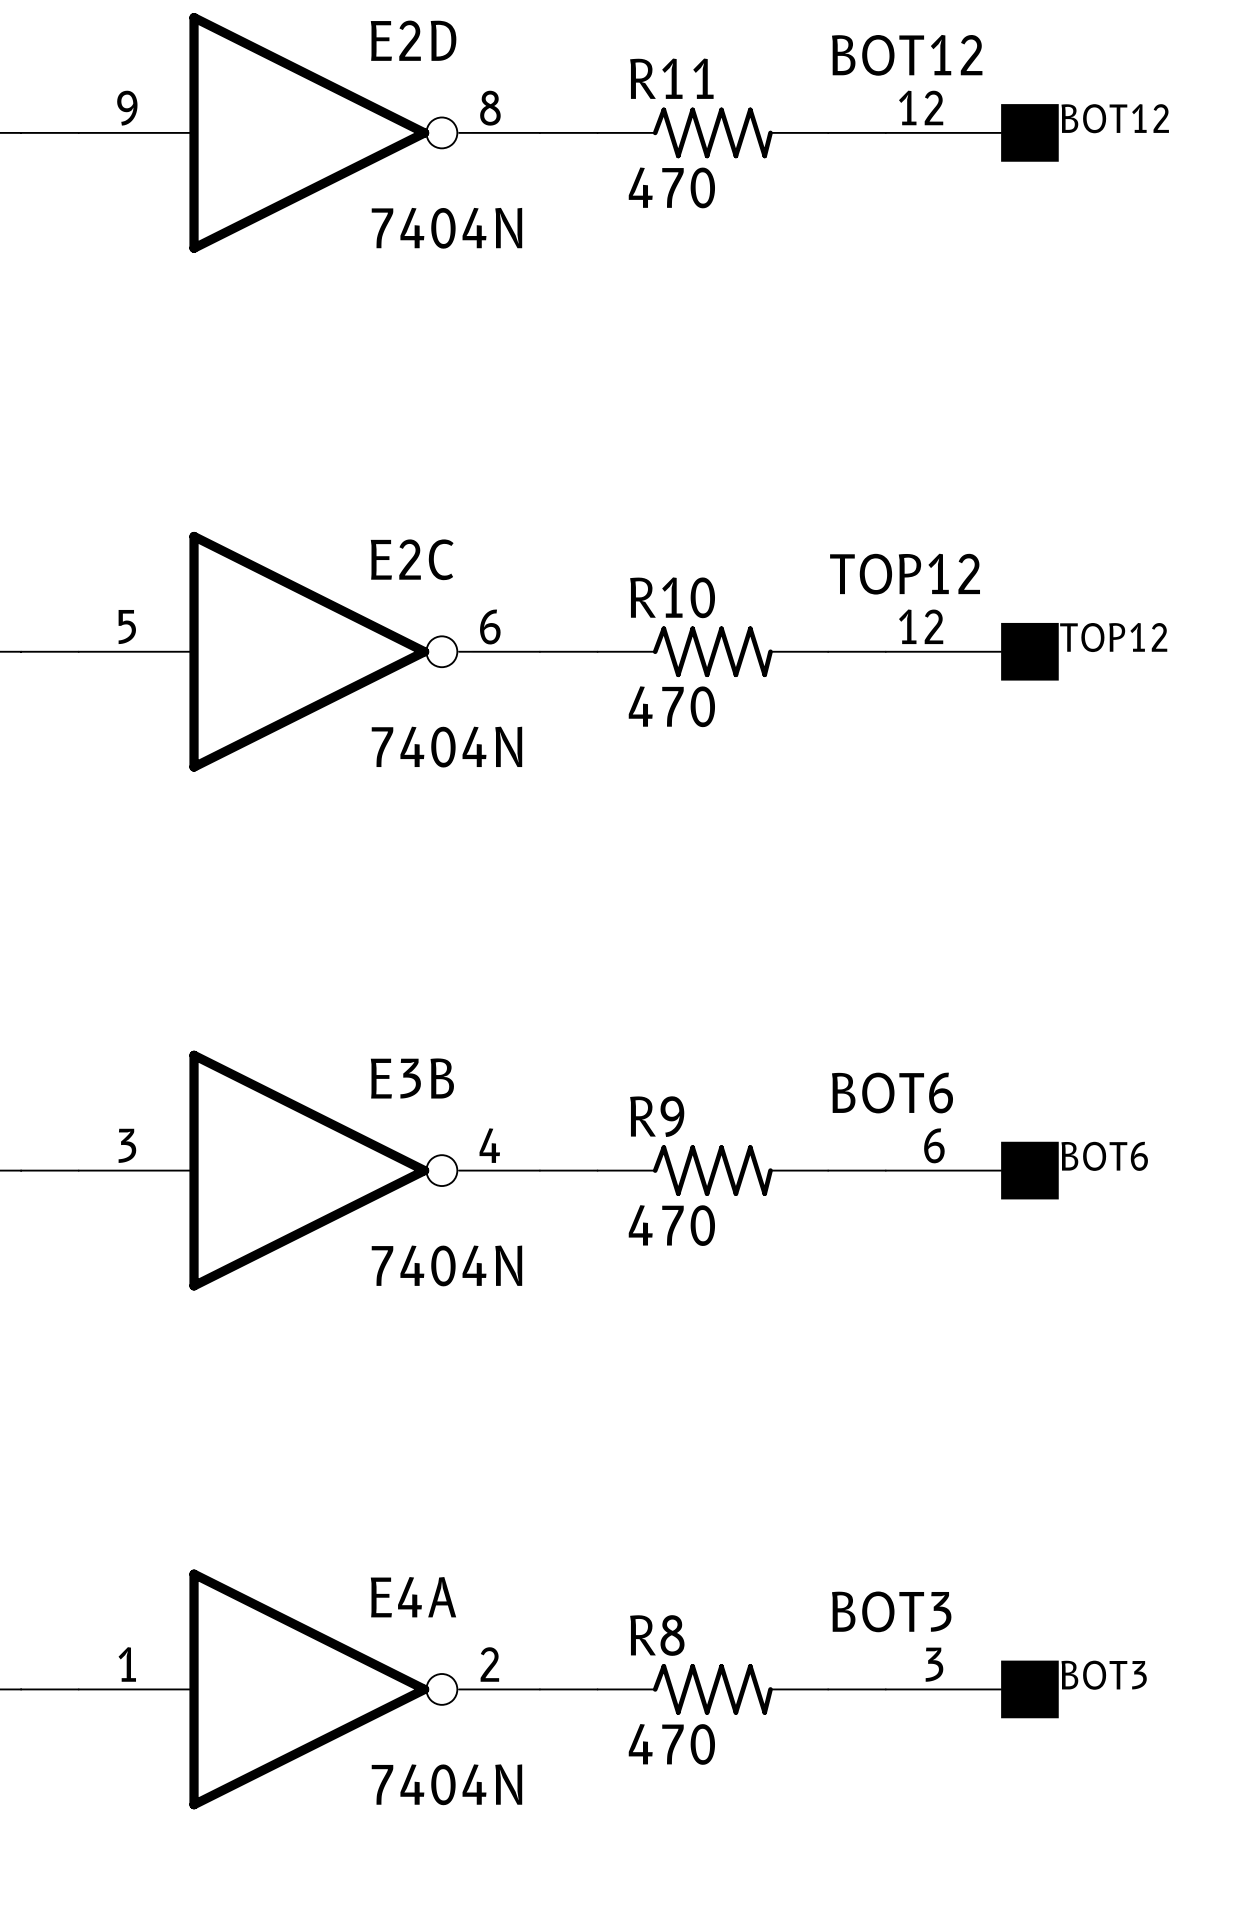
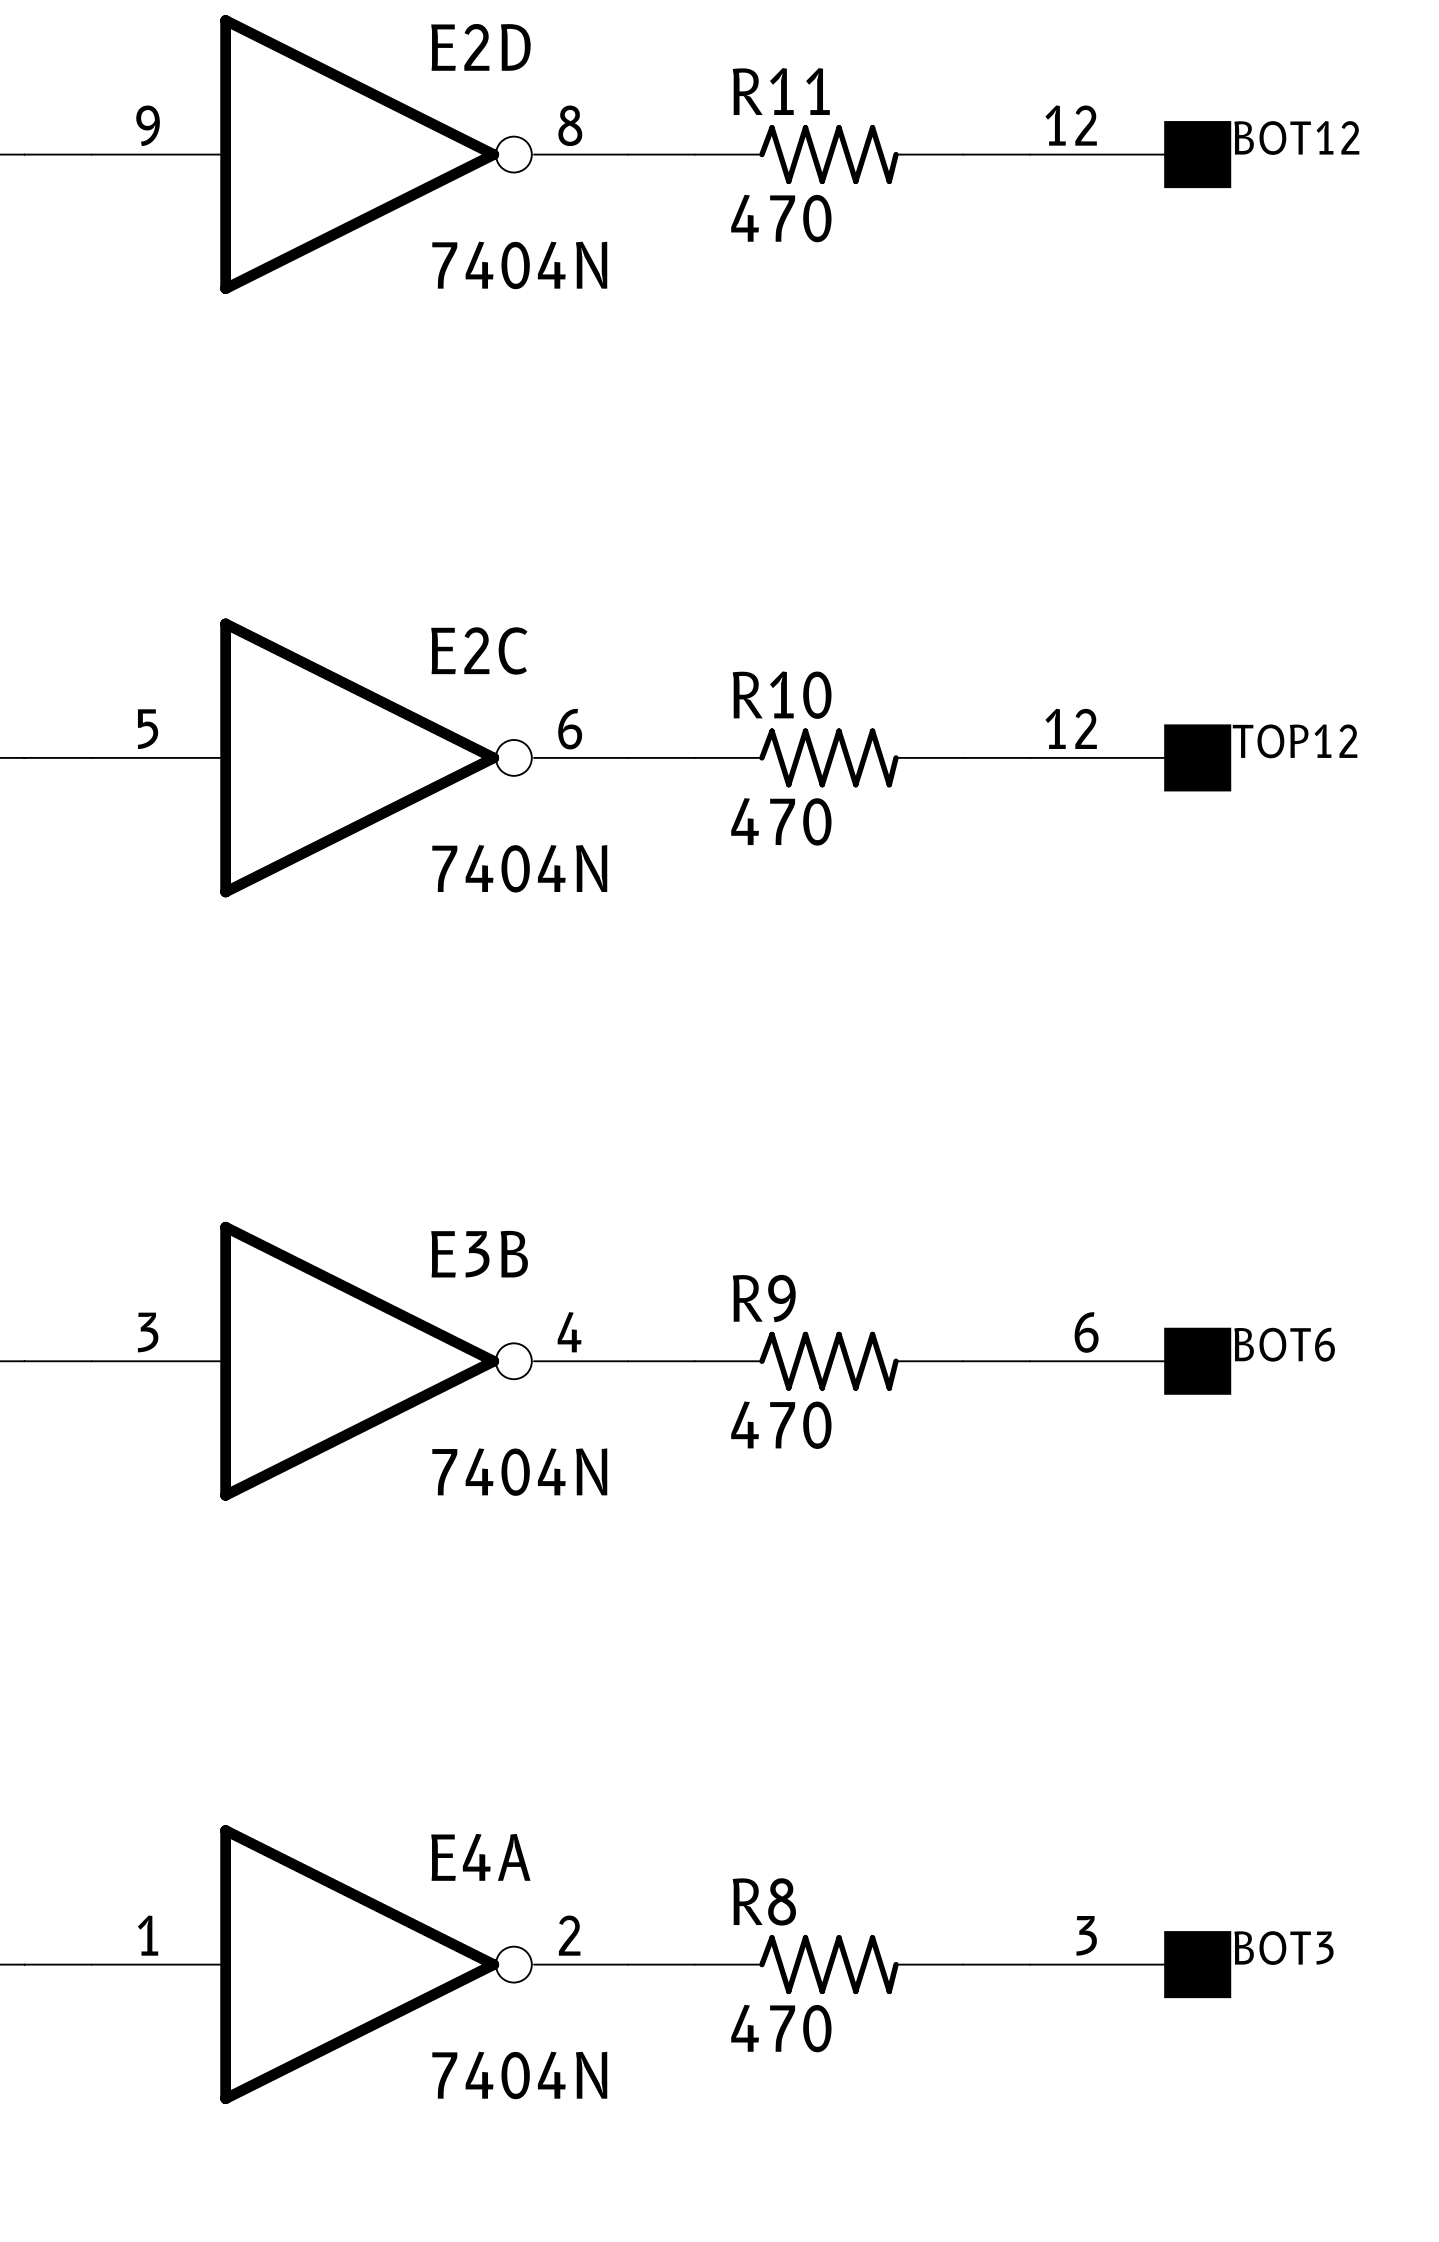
label: BOT12 (907, 55) -> none
label: TOP12 (905, 574) -> none
label: BOT6 (892, 1093) -> none
label: BOT3 (891, 1611) -> none

